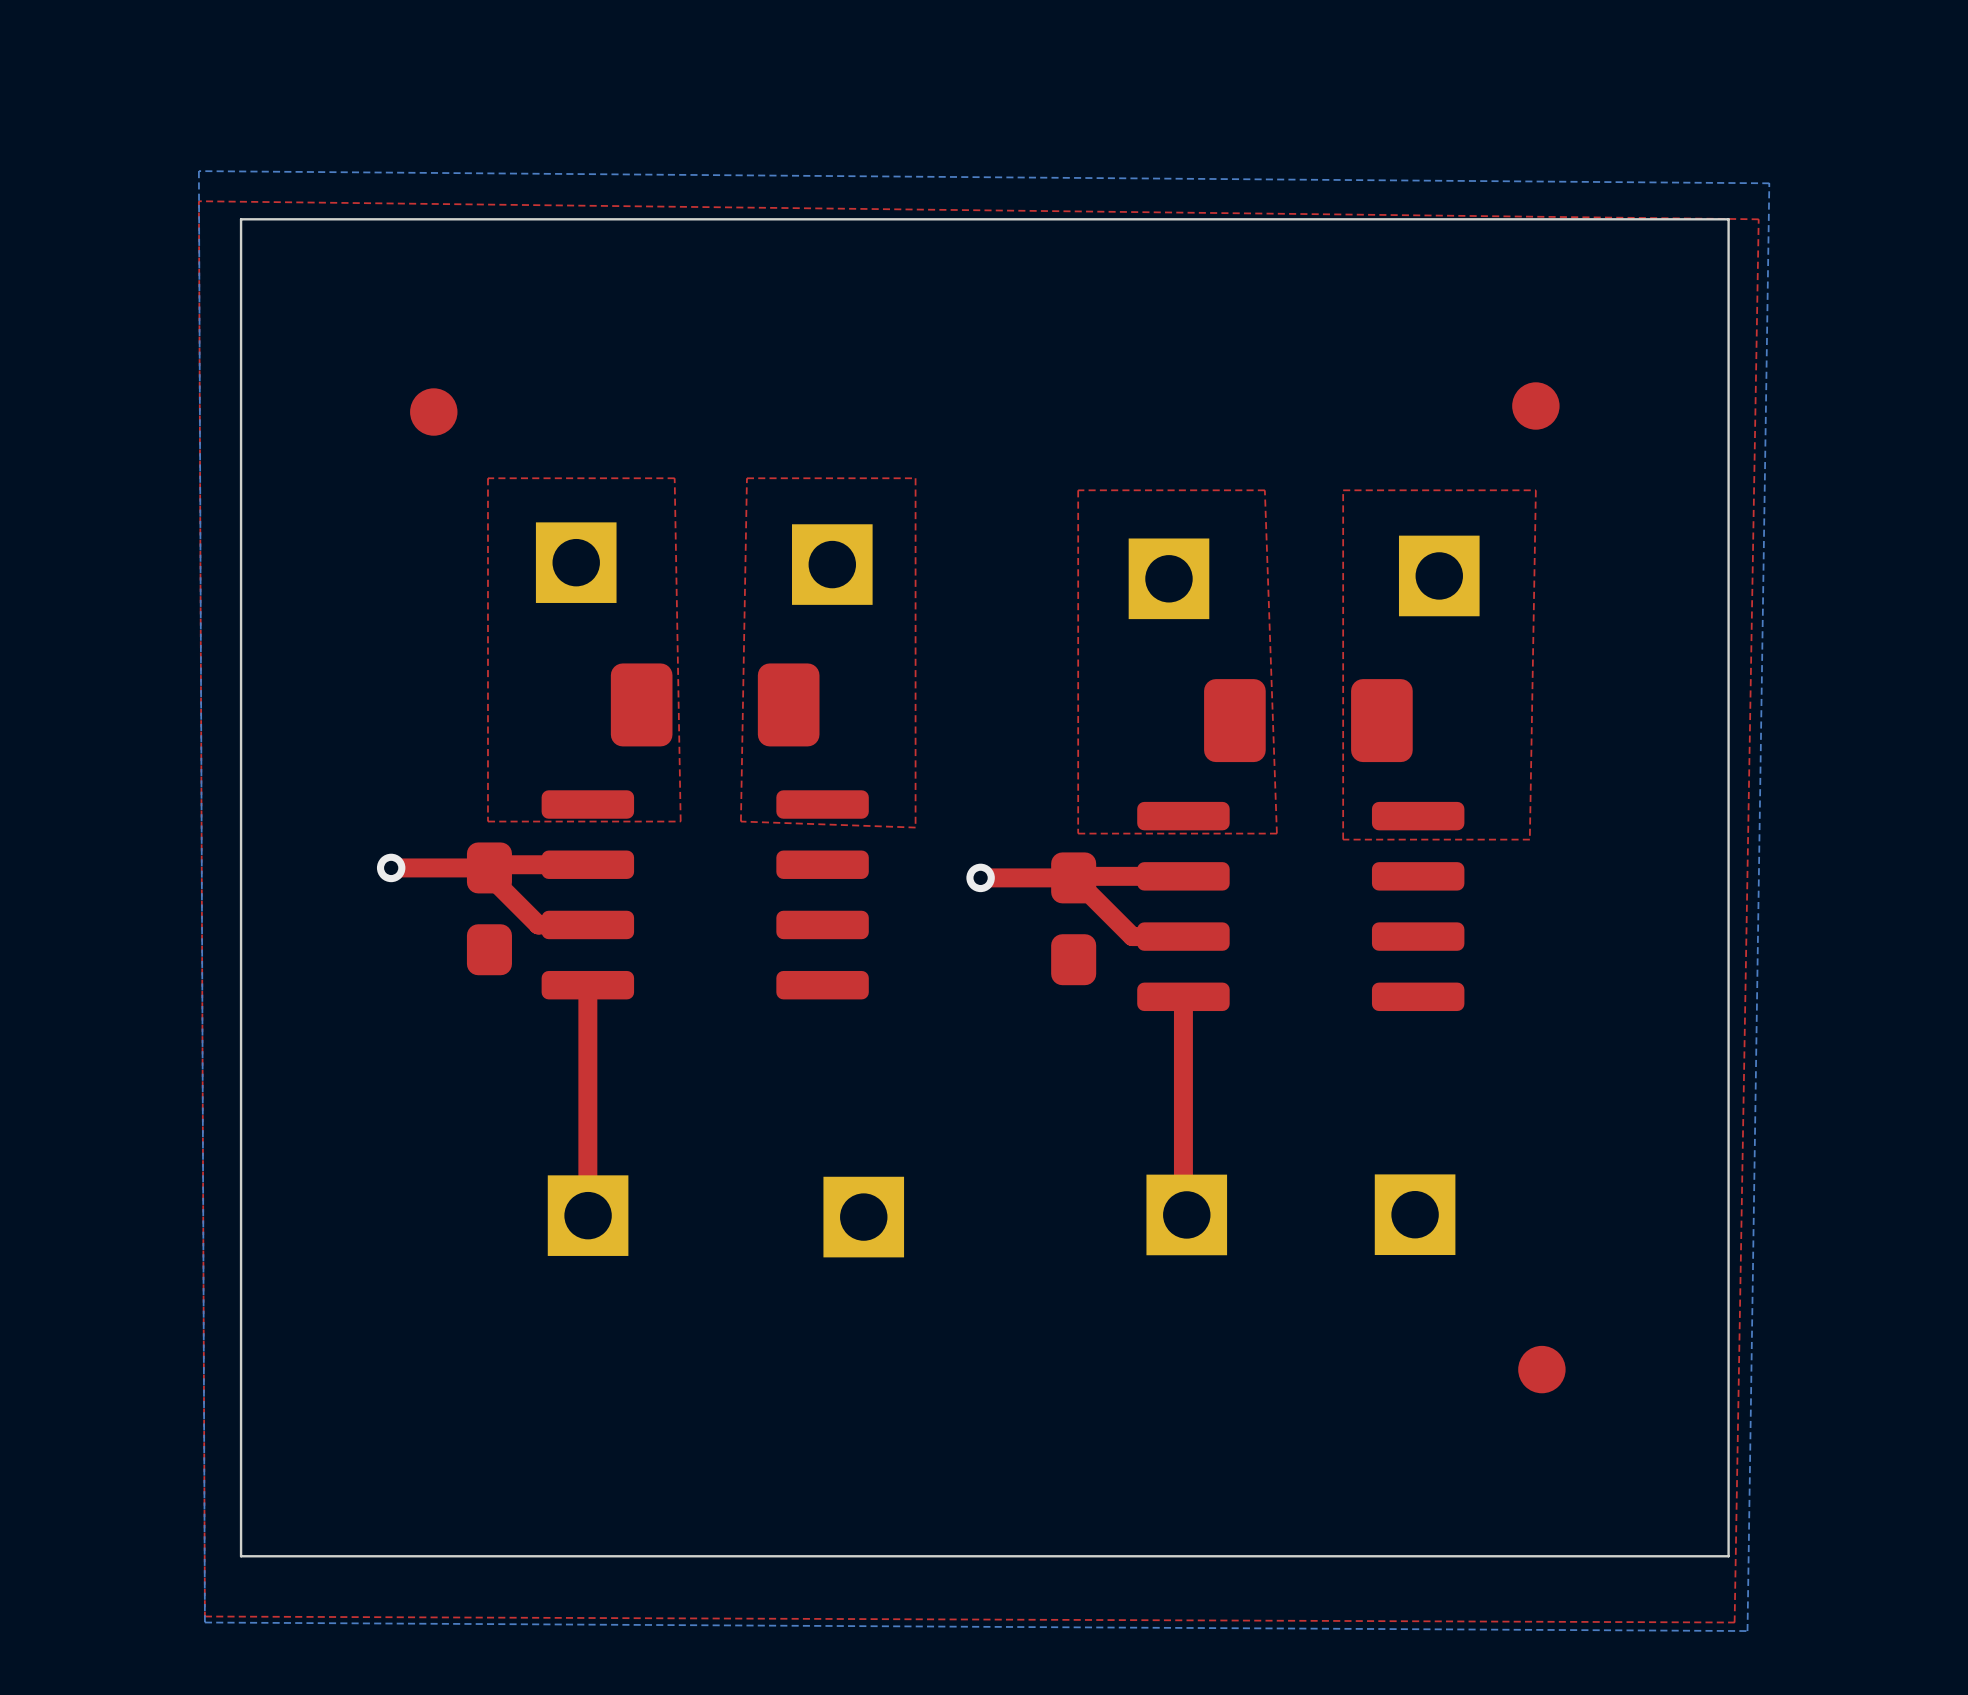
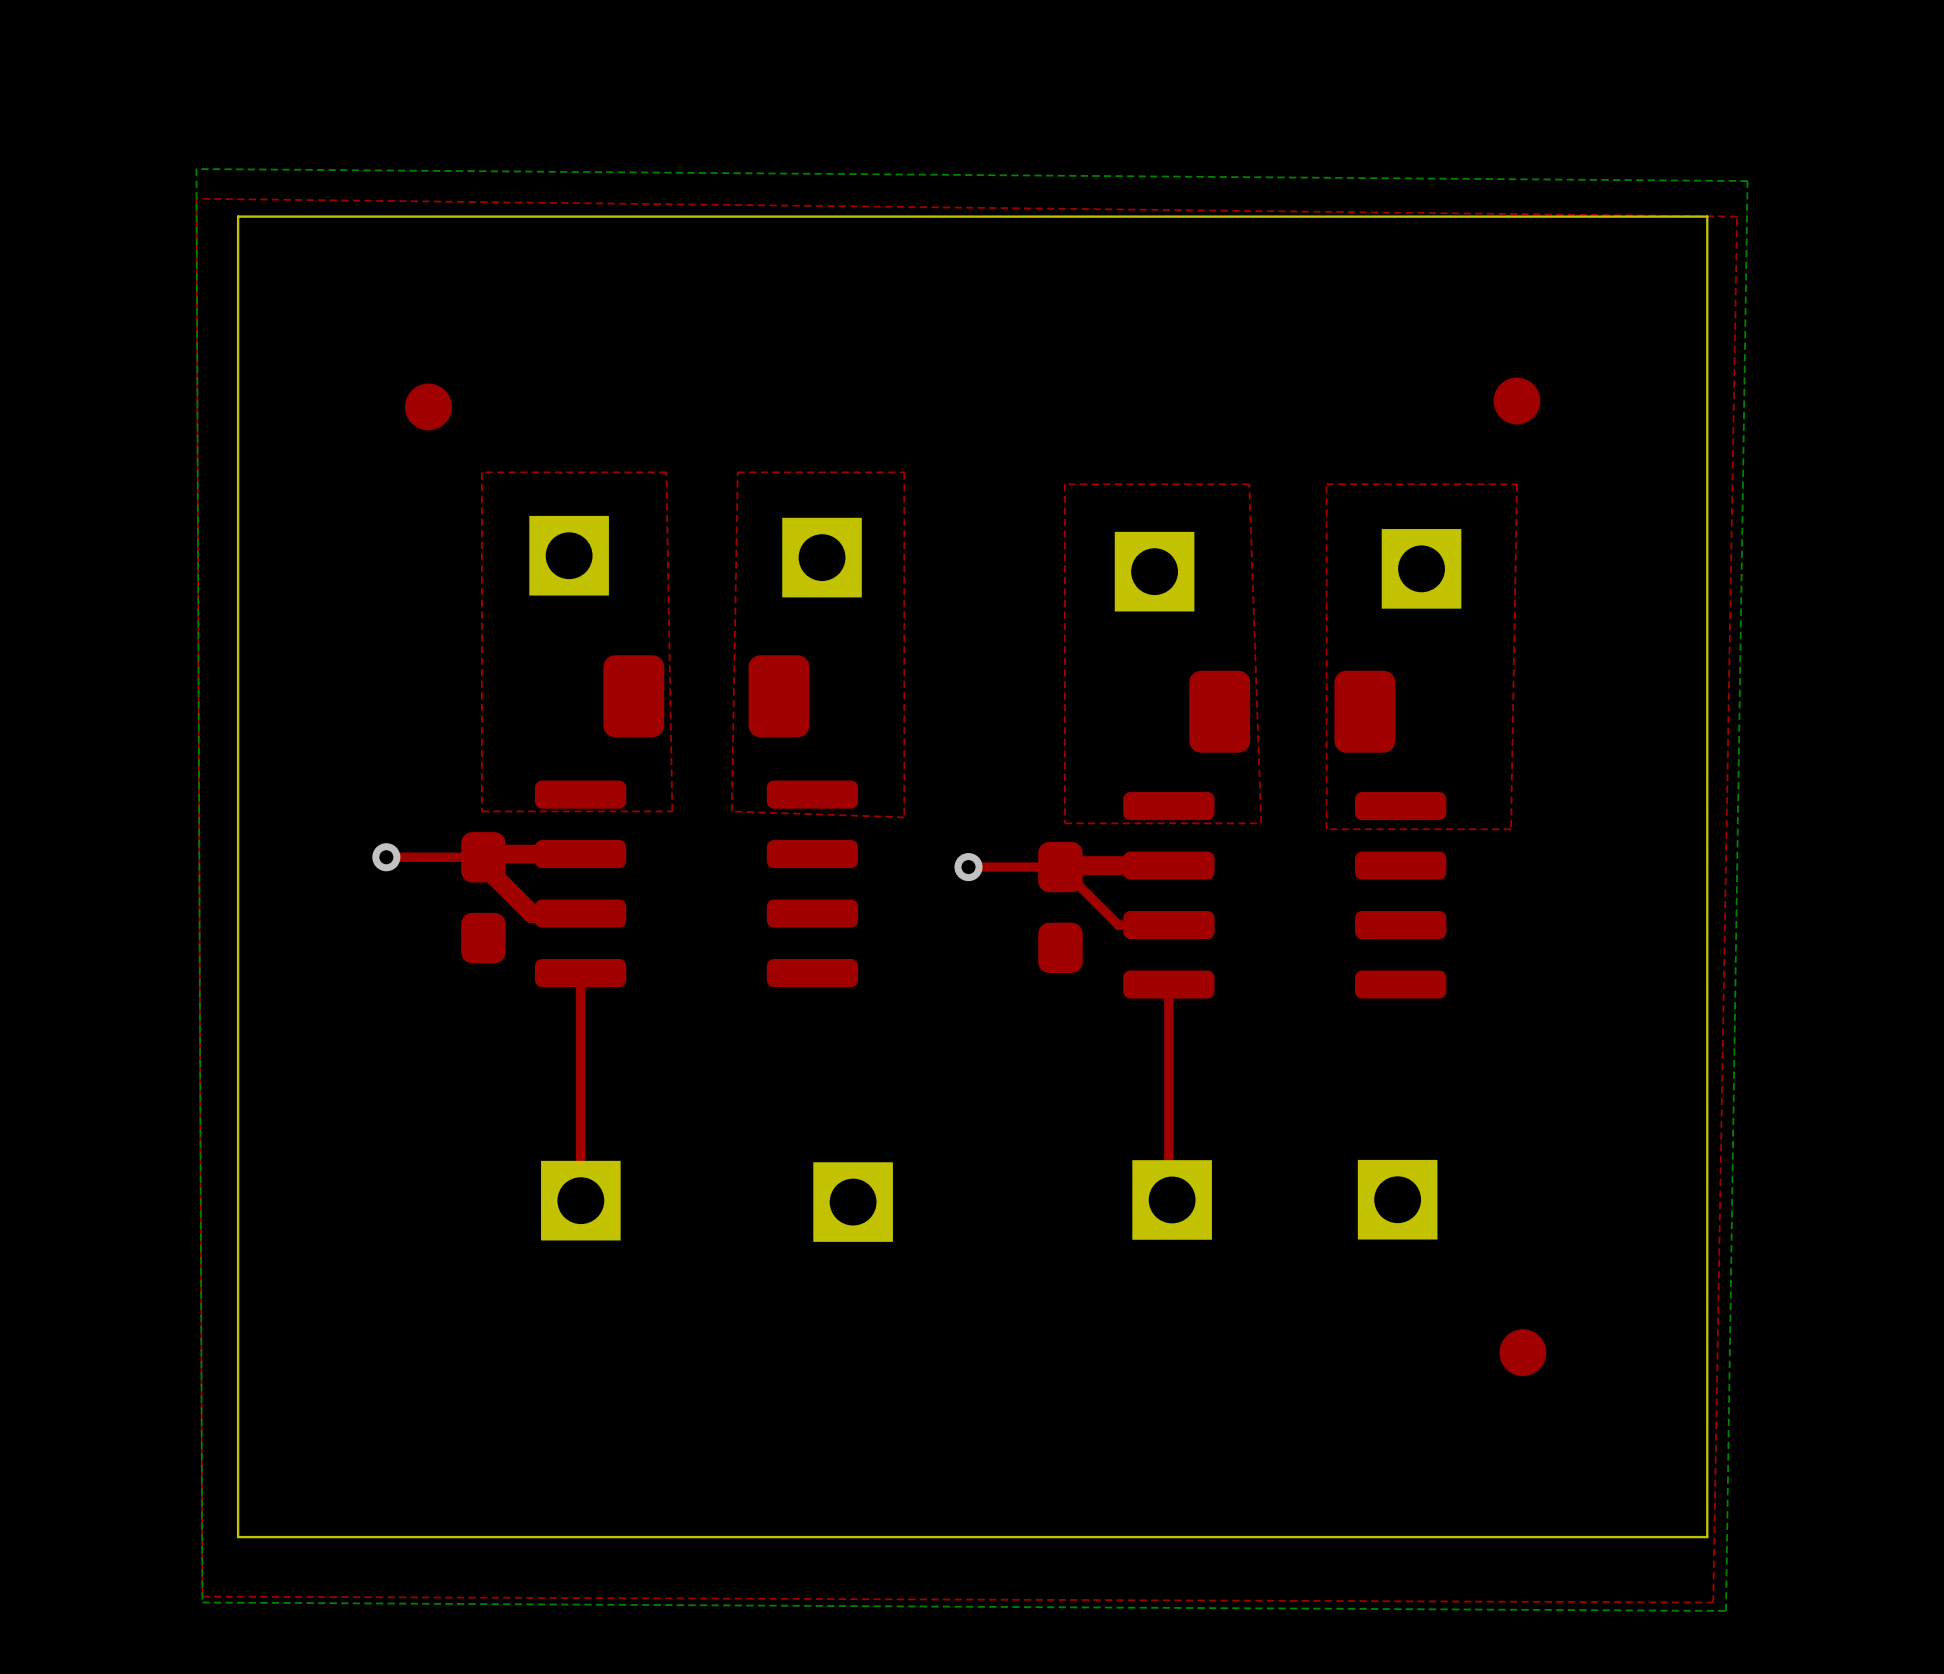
top track width: thick (489, 867) (391, 867) -> thin (483, 857) (386, 857)
top track width: thick (980, 877) (1073, 877) (1132, 936) (1183, 936) -> thin (968, 867) (1060, 867) (1118, 925) (1168, 925)
top track width: thick (587, 985) (587, 1215) -> thin (580, 973) (580, 1200)
top track width: thick (1183, 996) (1183, 1211) -> thin (1168, 984) (1168, 1196)

